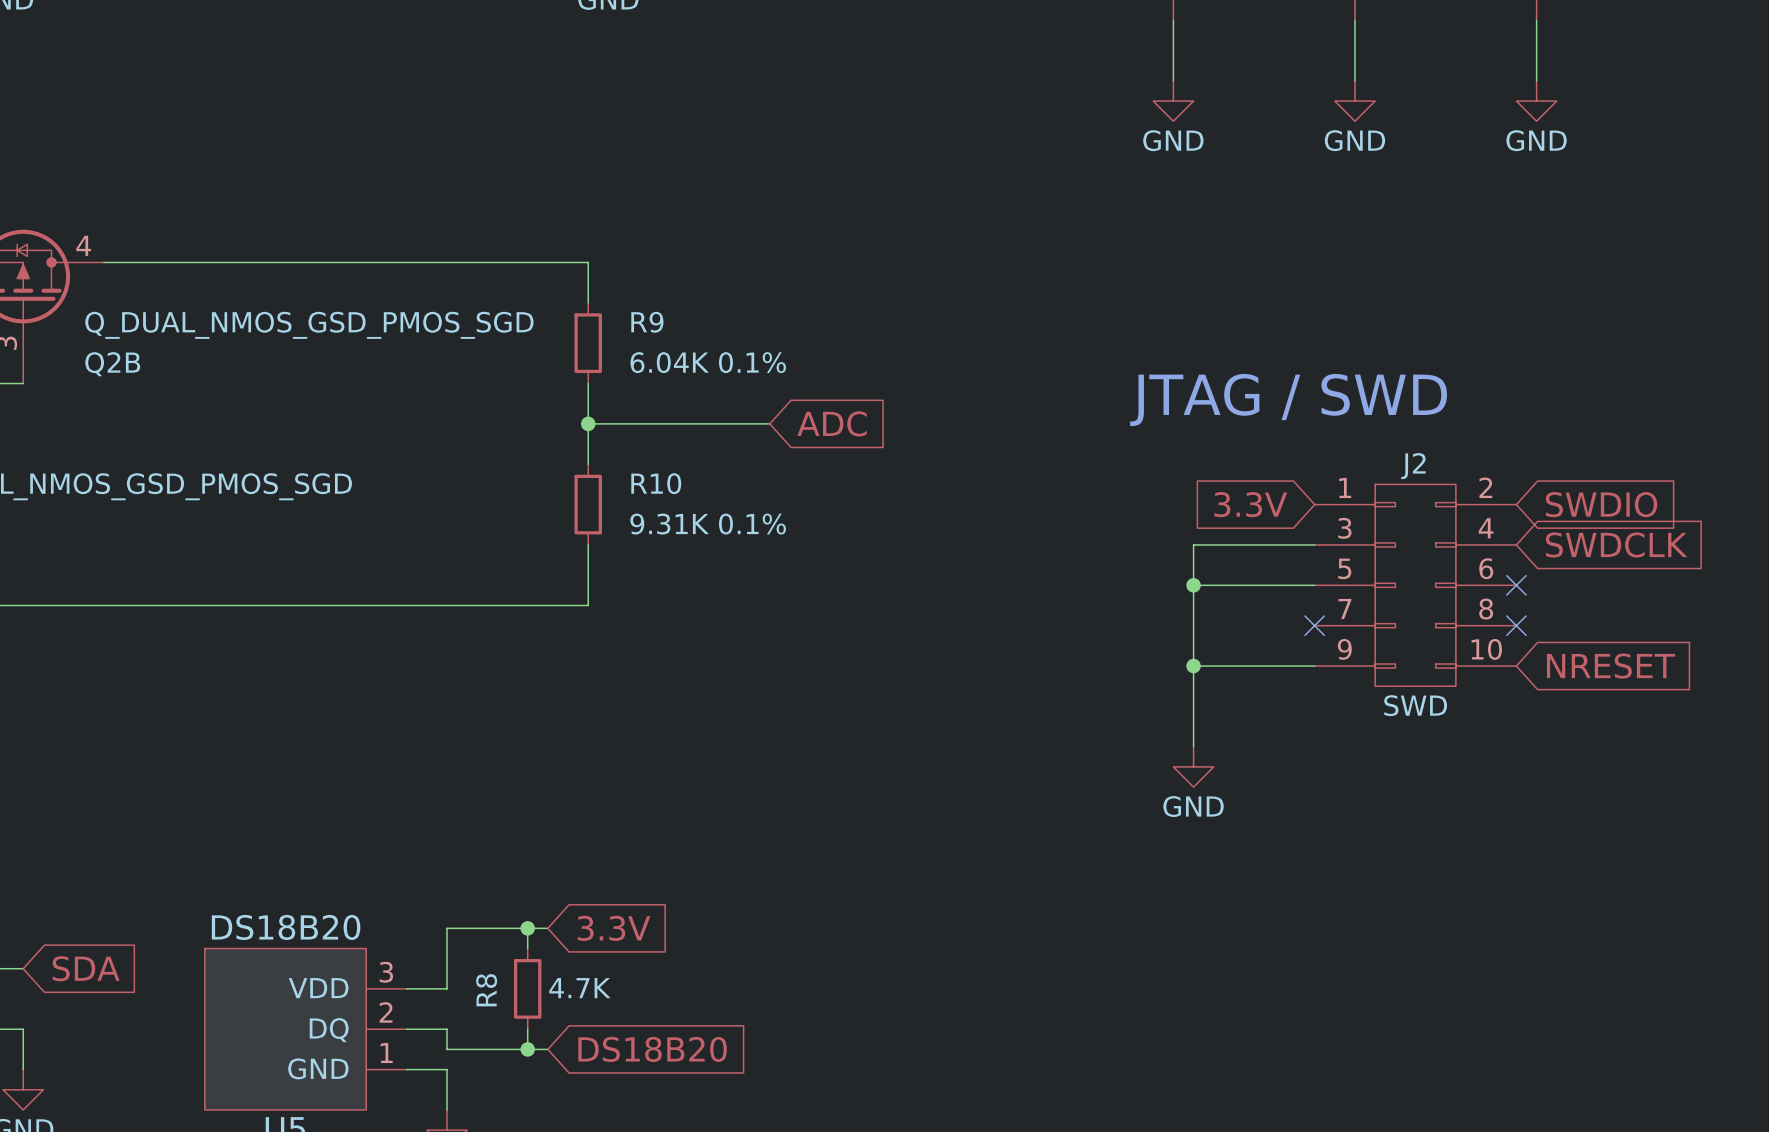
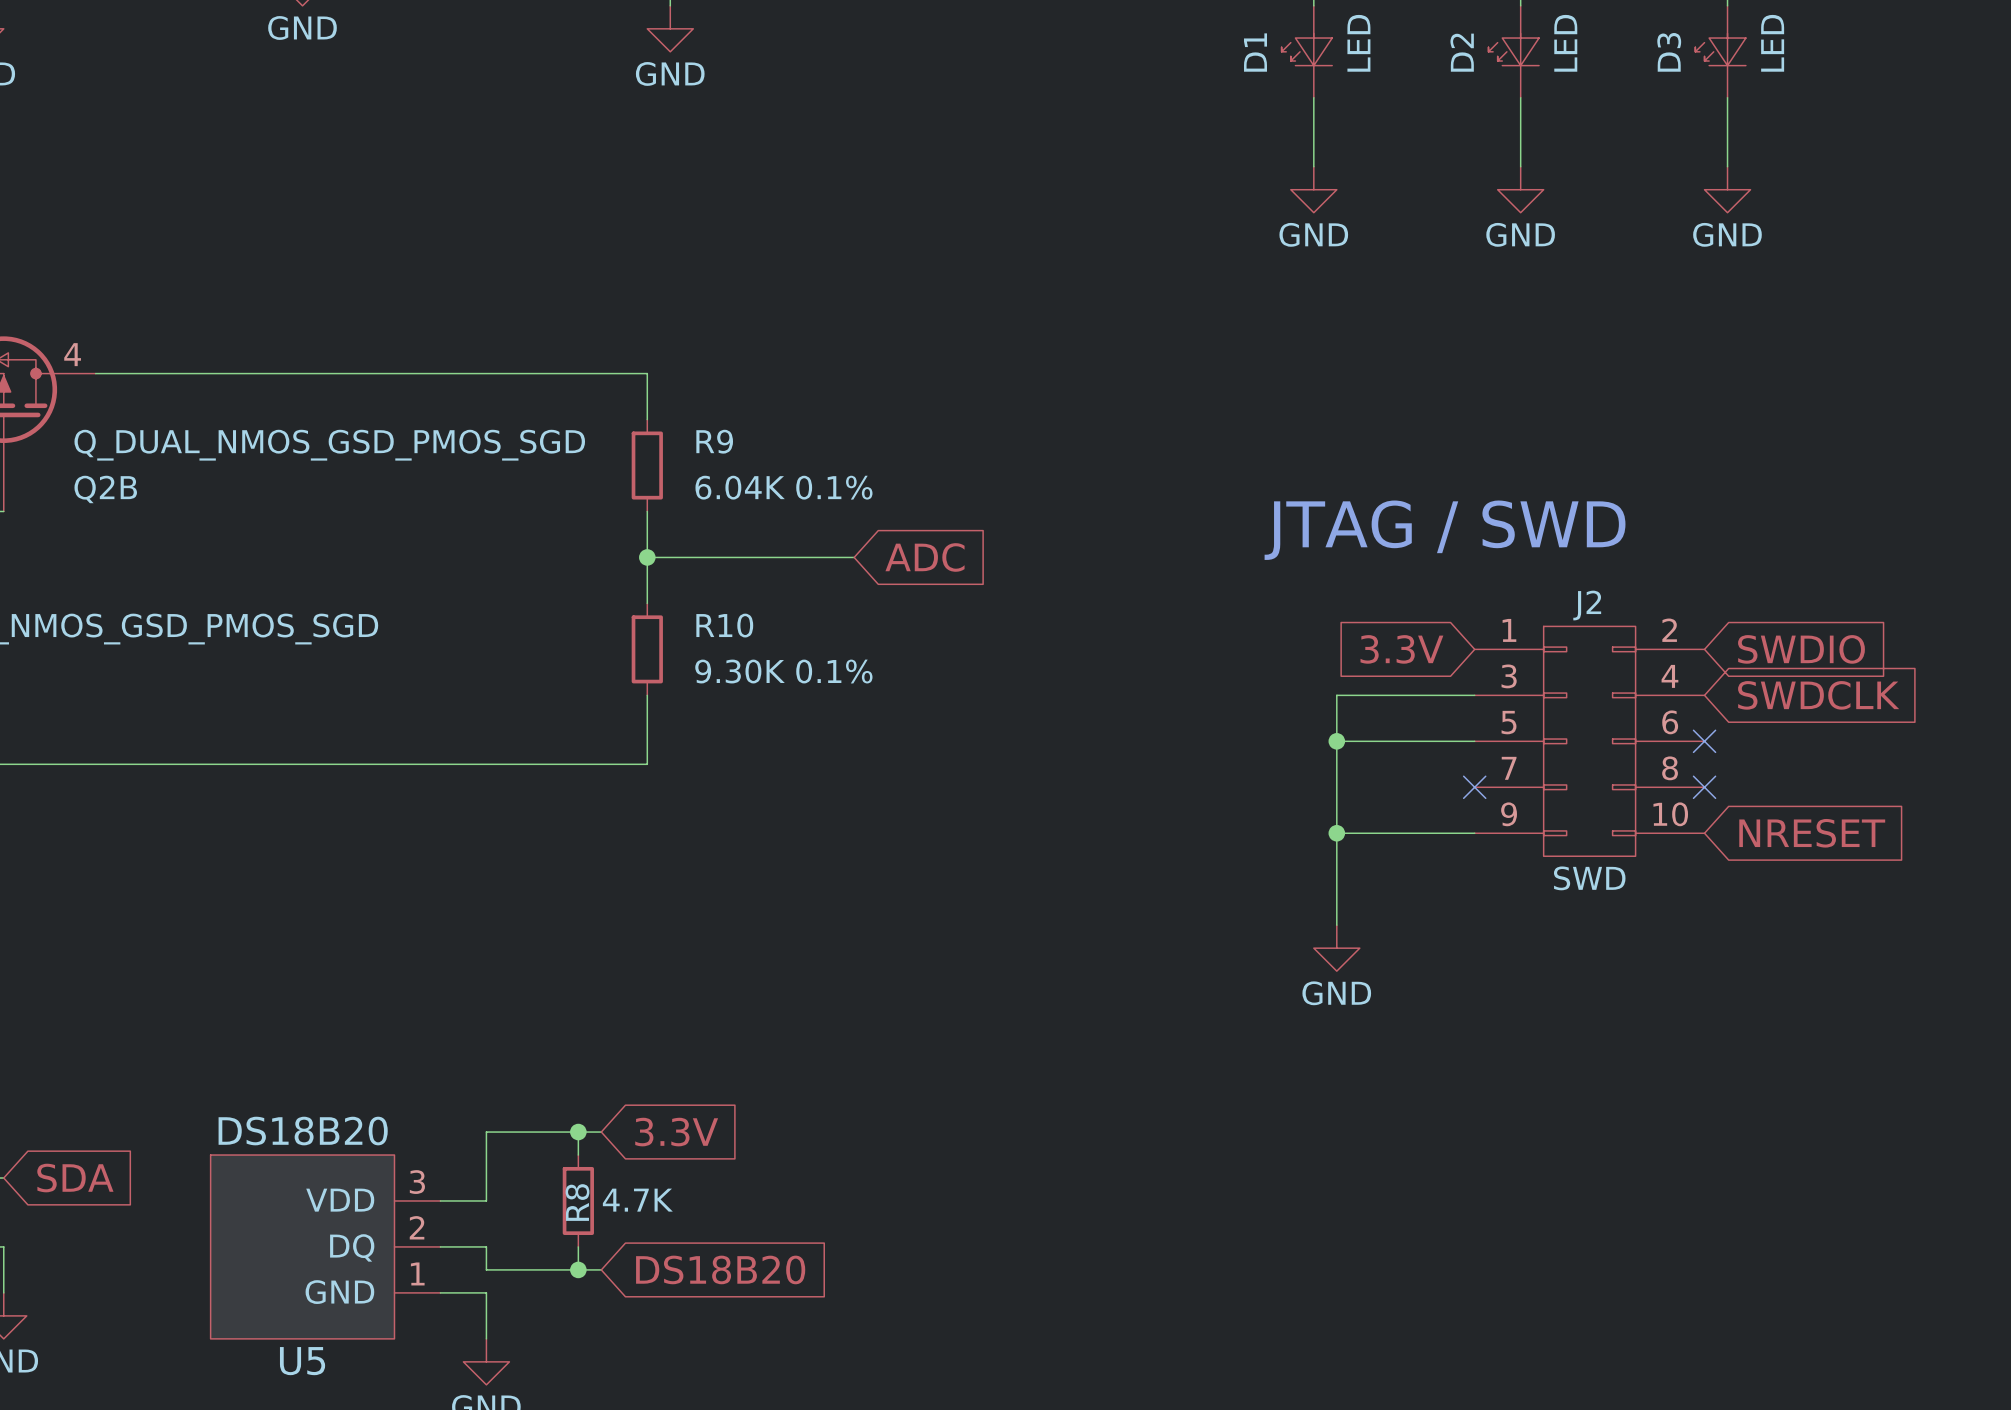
R10 value: 9.31K 0.1% (708, 524) -> 9.30K 0.1% (783, 671)
R8 name position: R8 (486, 990) -> R8 (577, 1202)

